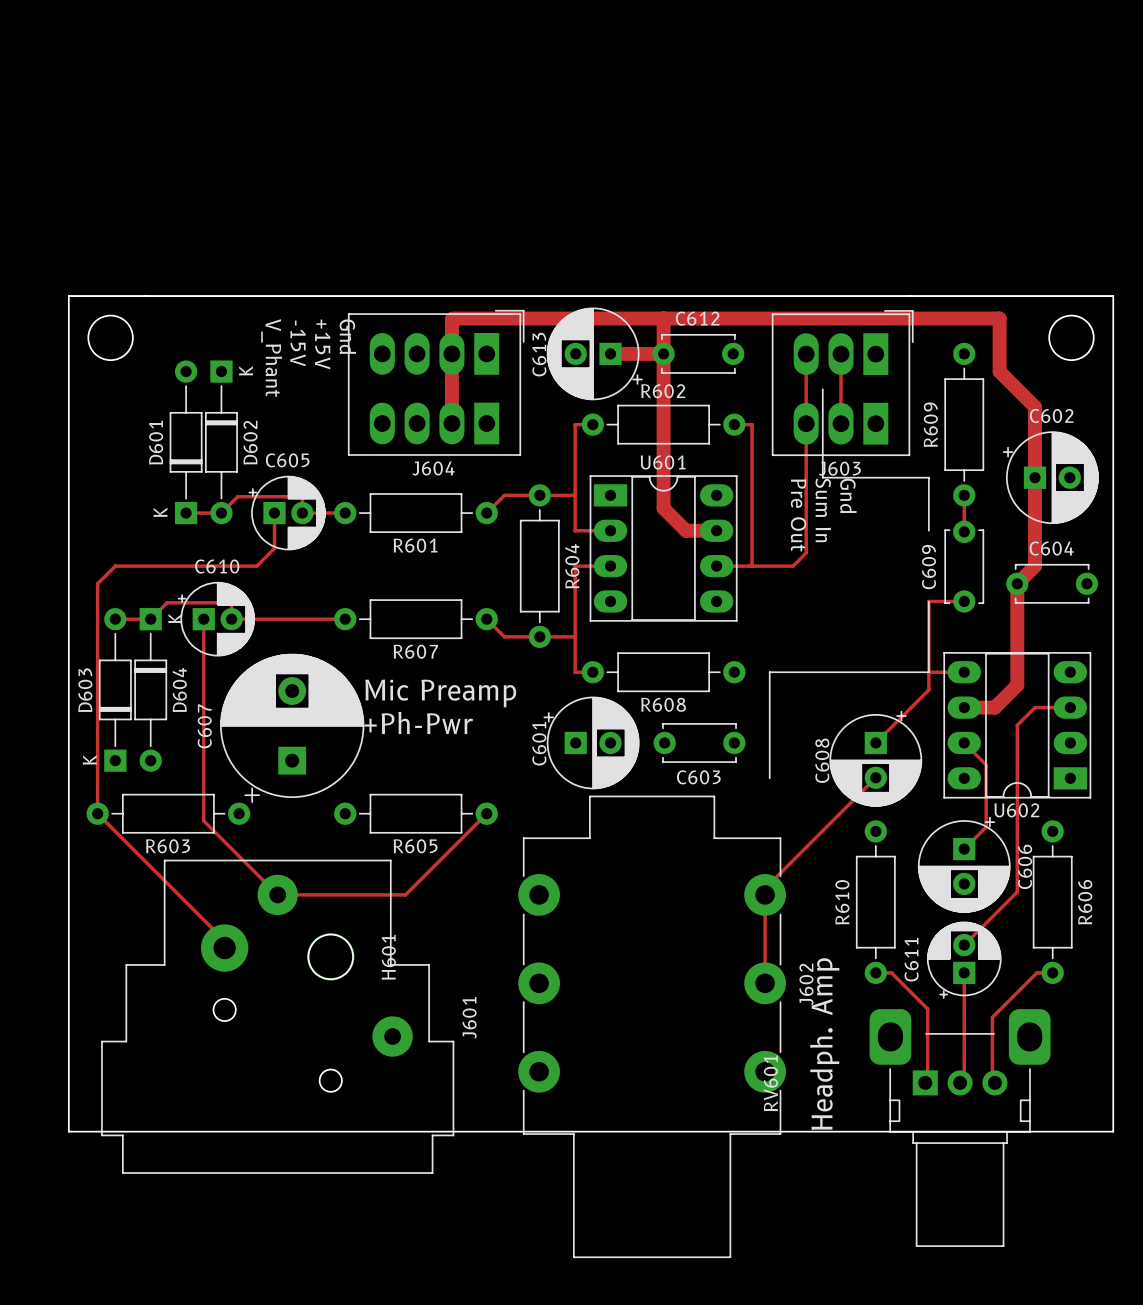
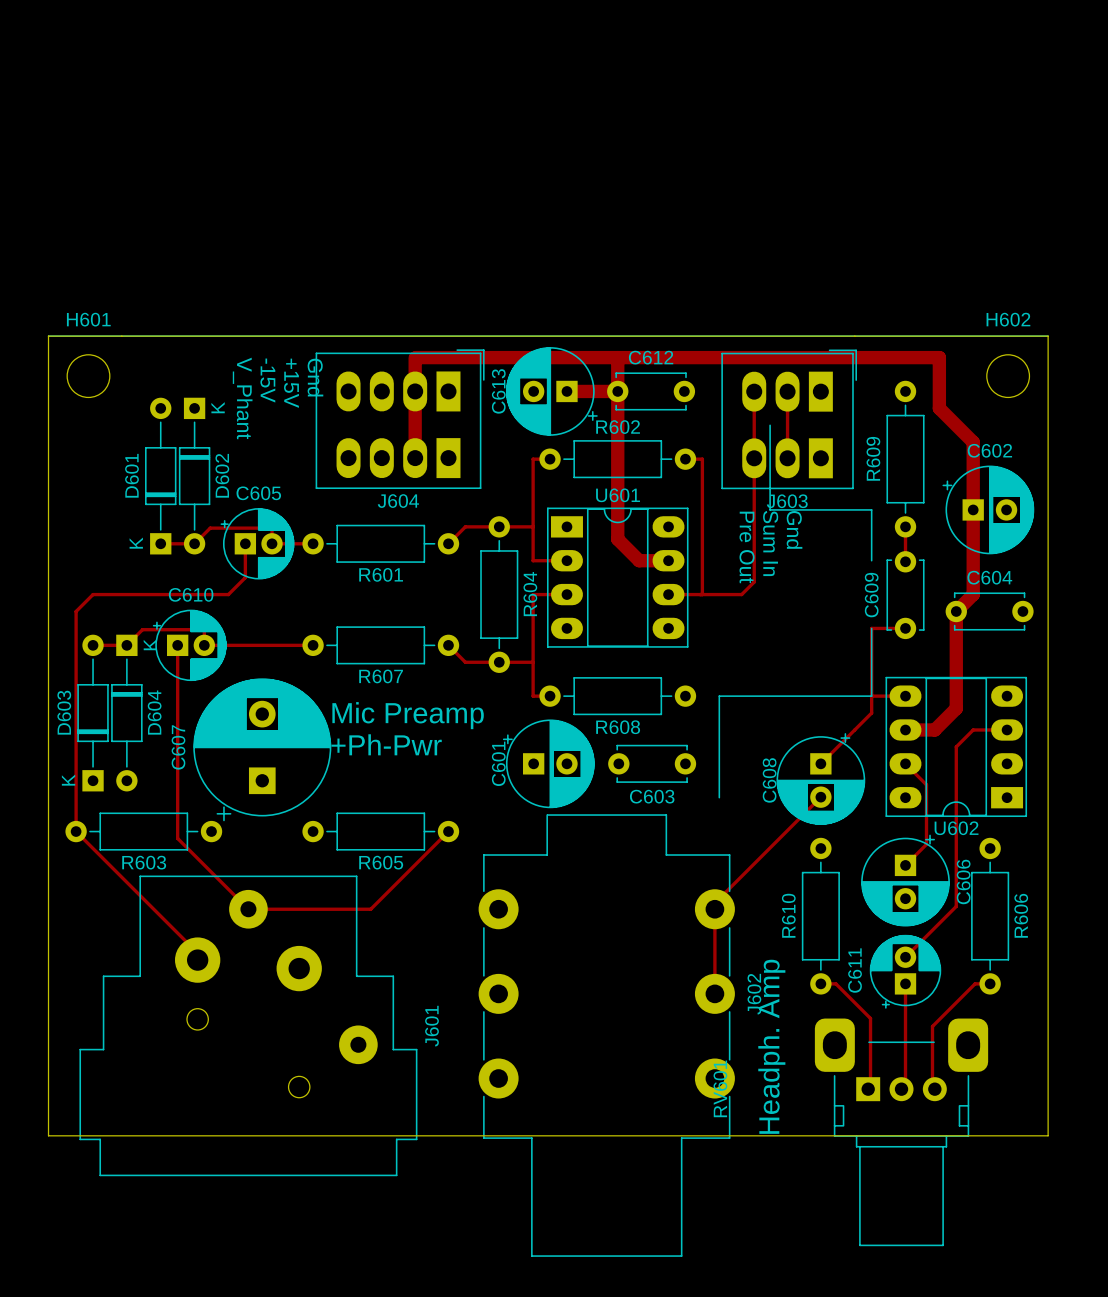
H601 name: none -> H601 (88, 319)
H602 name: none -> H602 (1008, 319)
H601: (330, 956) -> none

